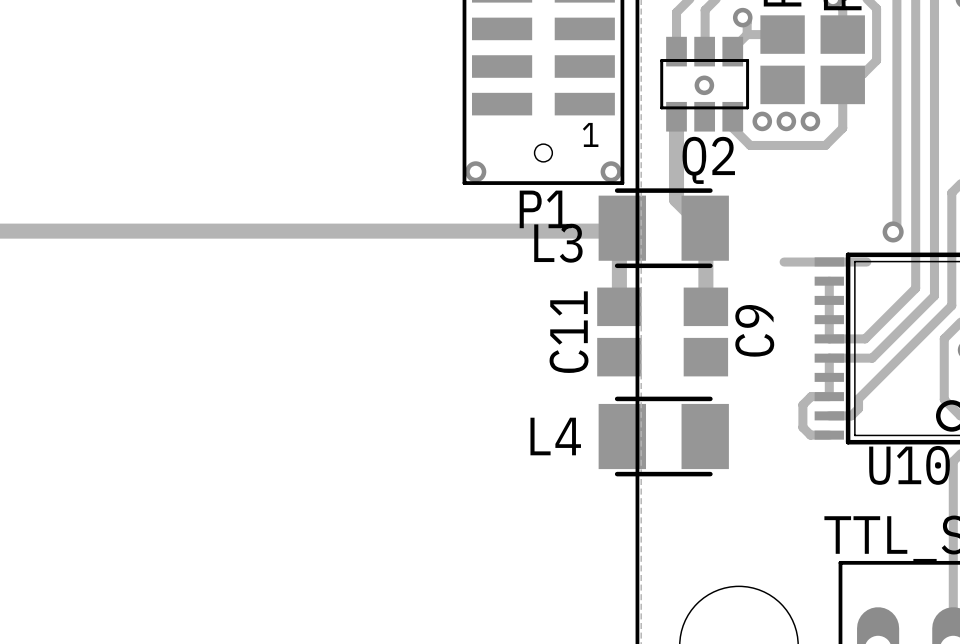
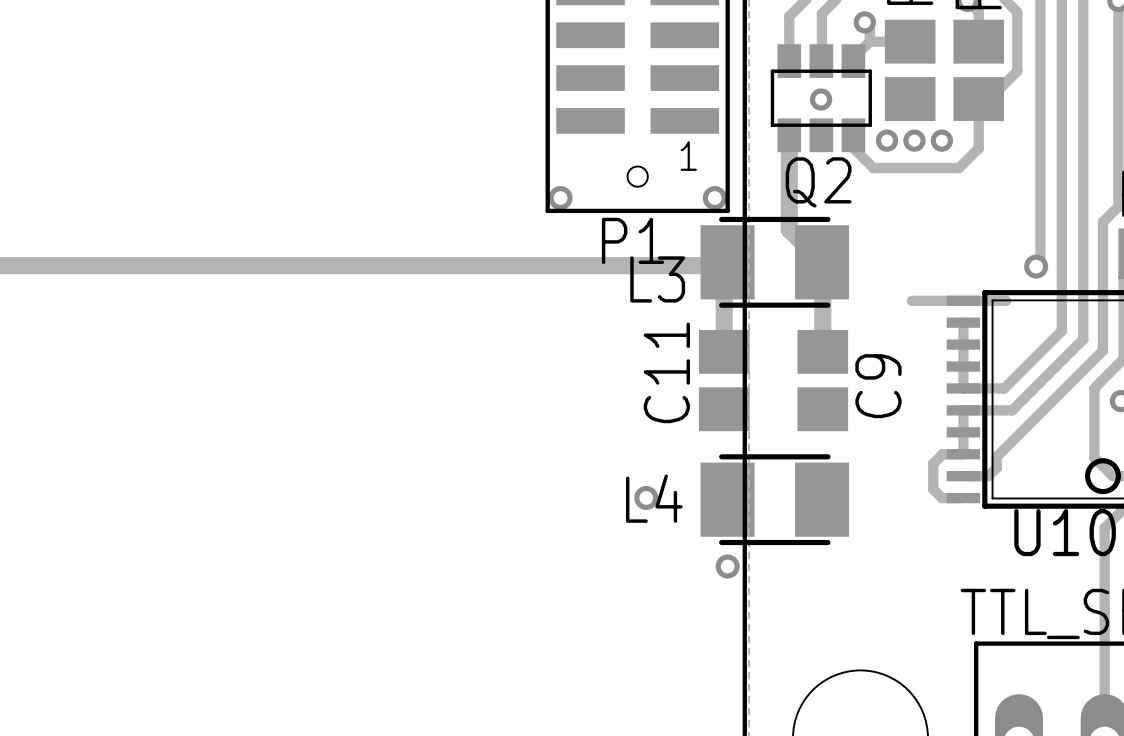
via: none -> (646, 497)
via: none -> (727, 566)

